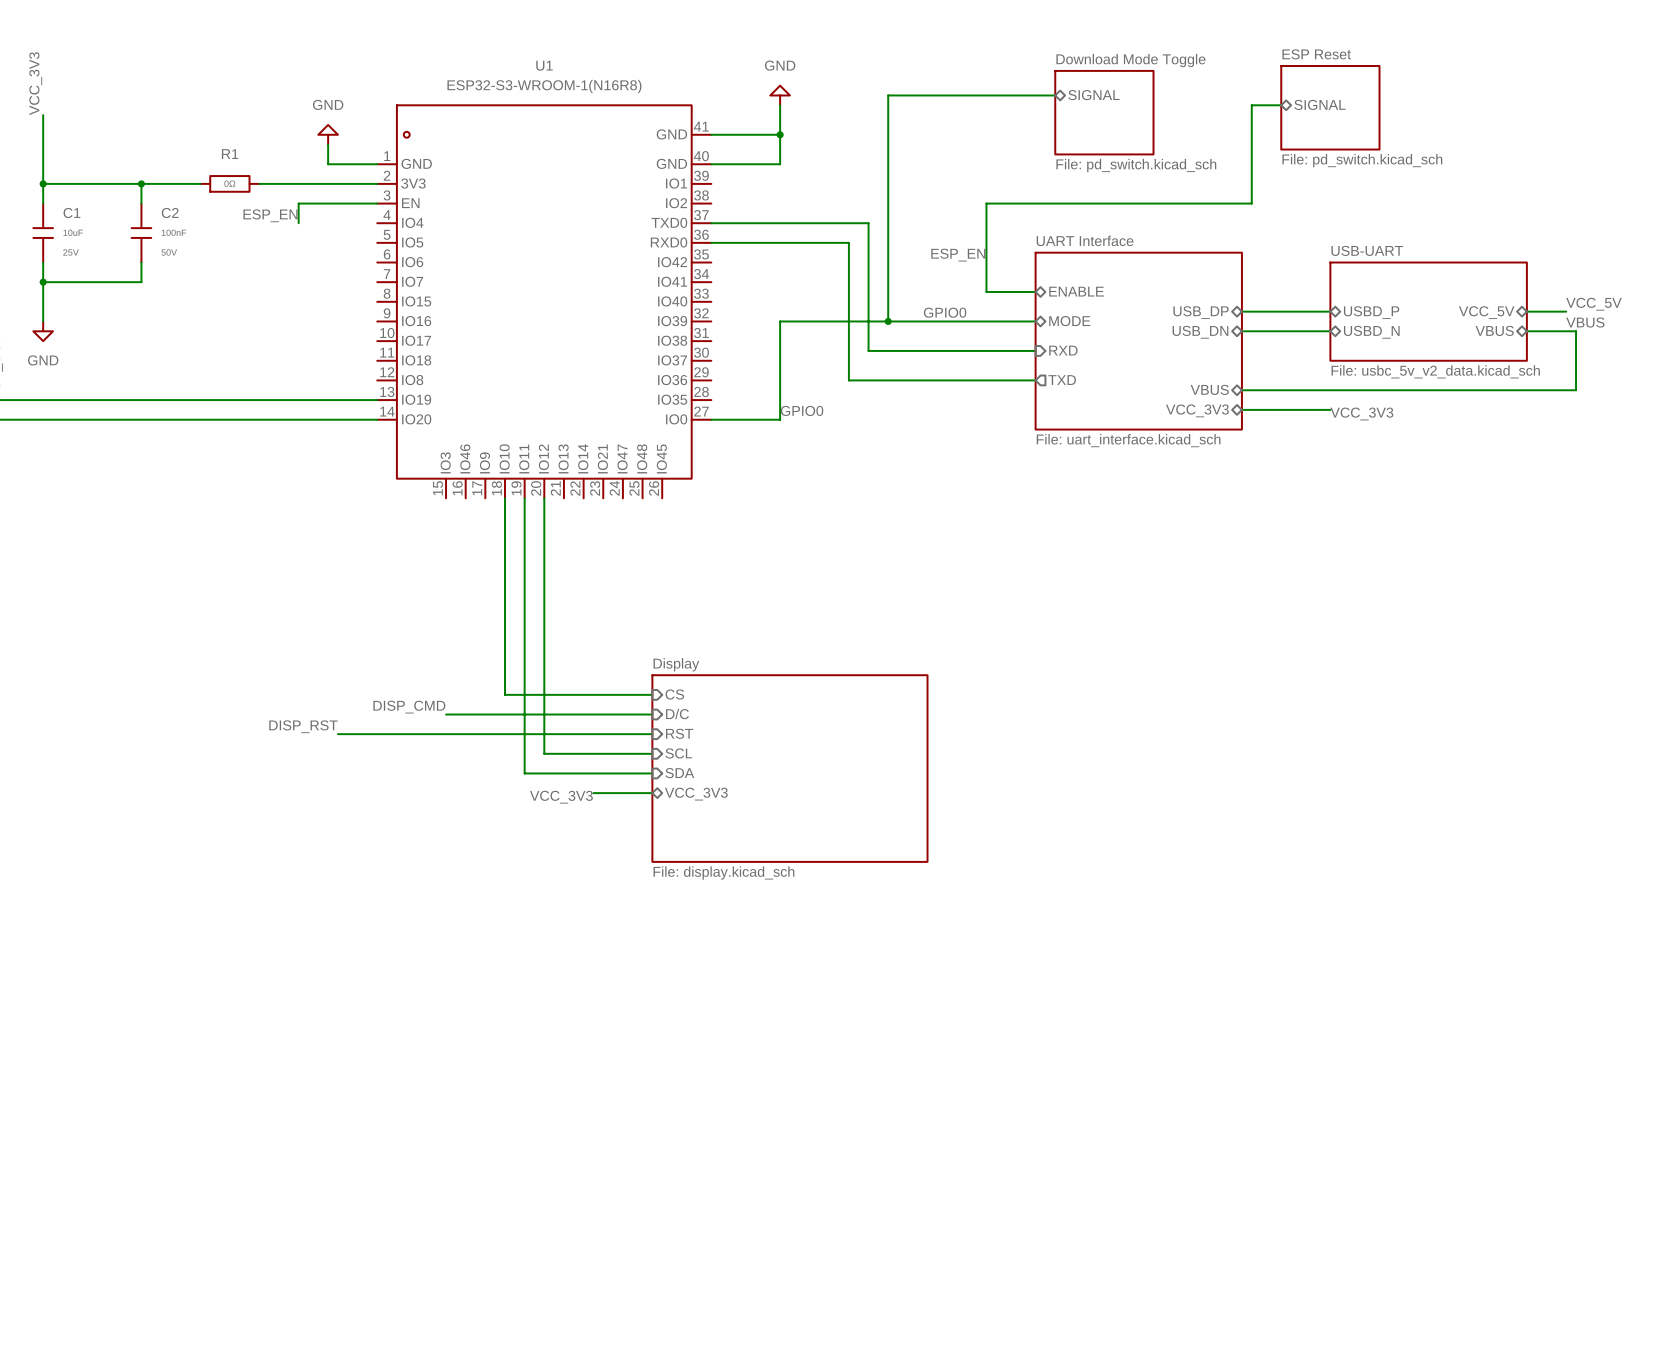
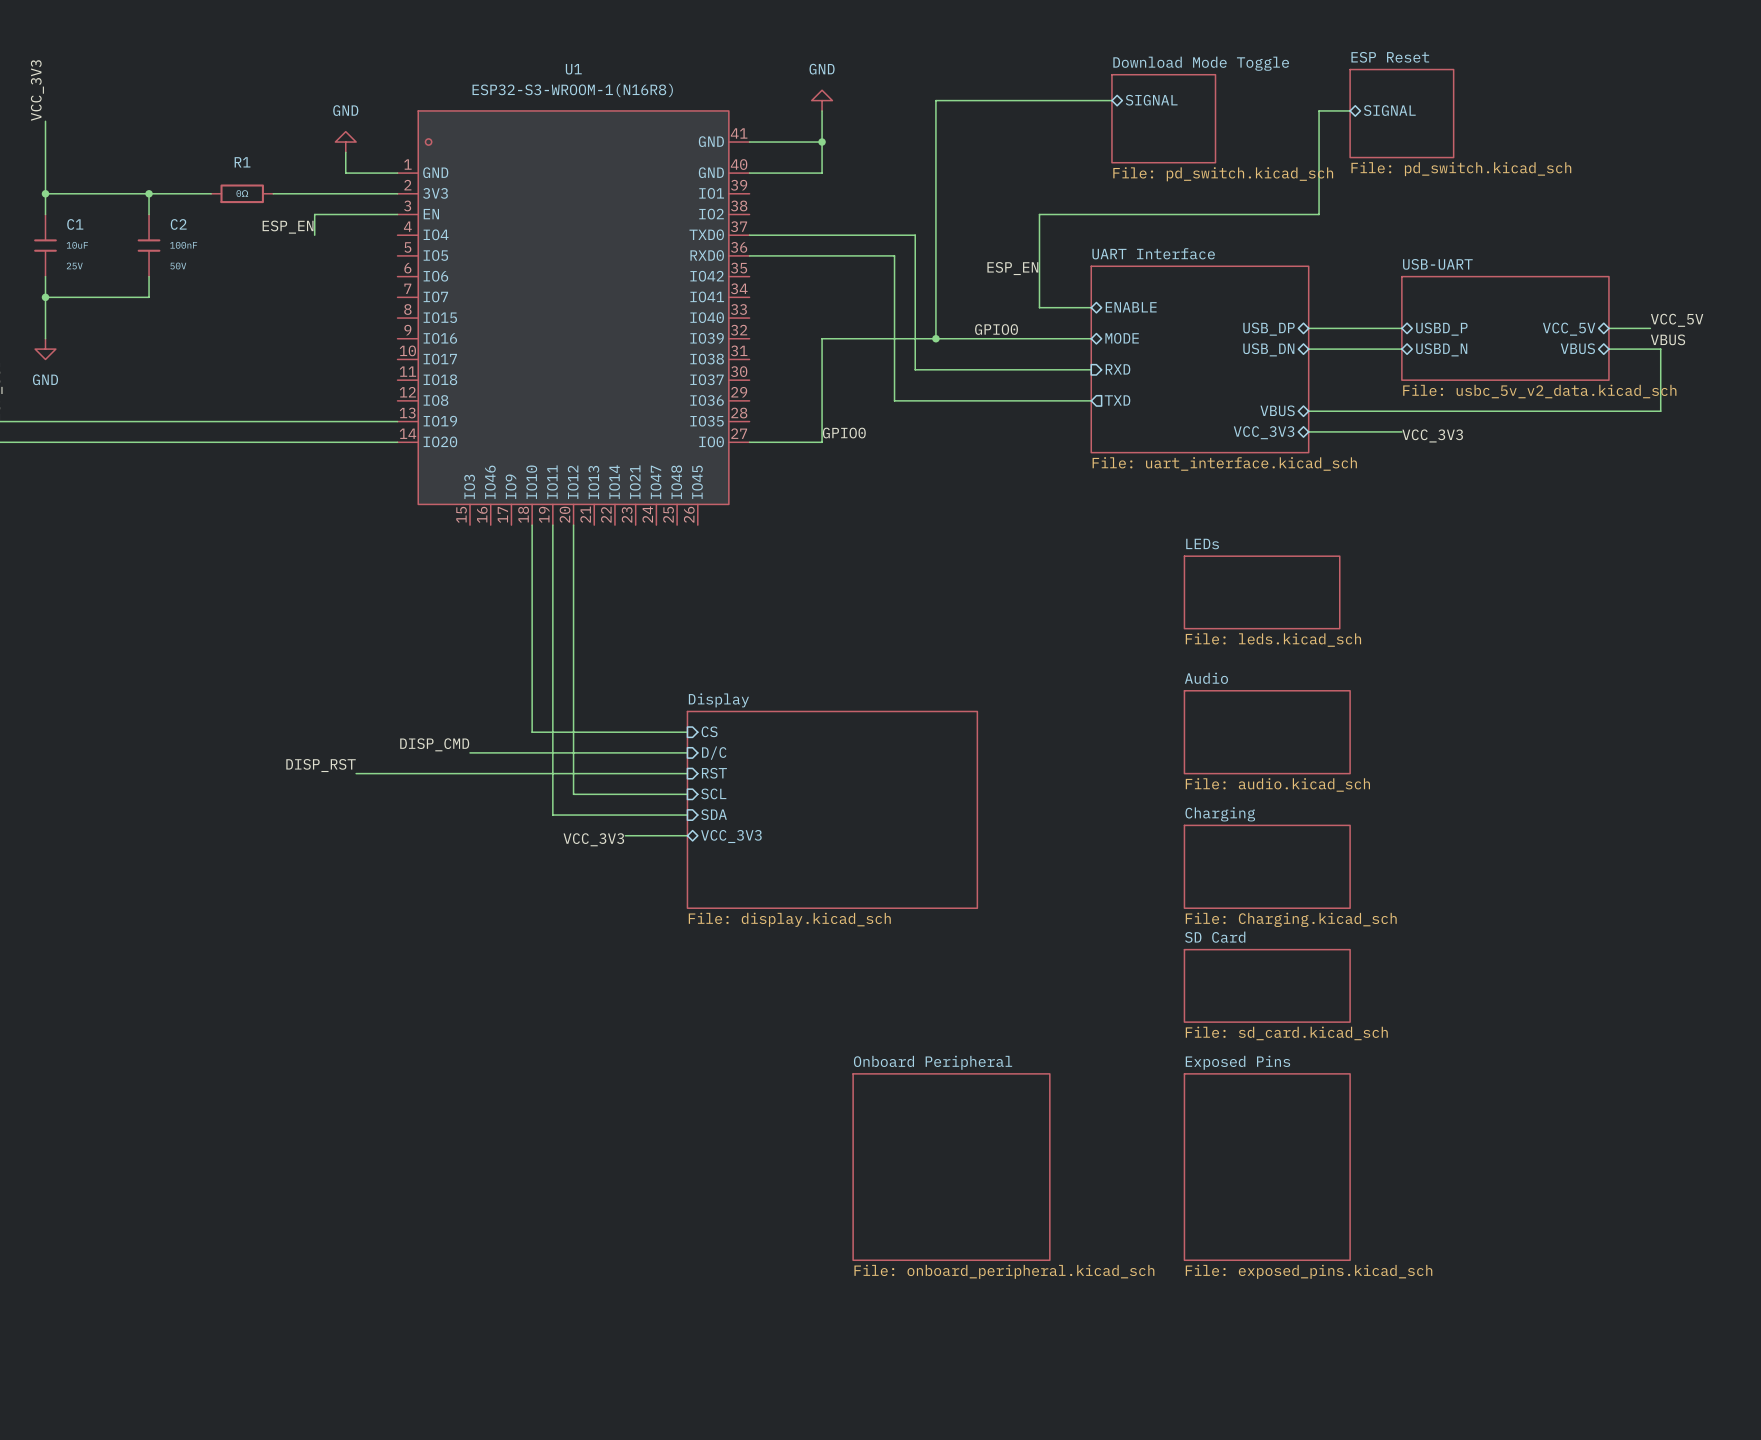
sheet LEDs: none -> File: leds.kicad_sch (1262, 592)
sheet Audio: none -> File: audio.kicad_sch (1267, 732)
sheet Charging: none -> File: Charging.kicad_sch (1267, 866)
sheet SD Card: none -> File: sd_card.kicad_sch (1267, 985)
sheet Onboard Peripheral: none -> File: onboard_peripheral.kicad_sch (951, 1167)
sheet Exposed Pins: none -> File: exposed_pins.kicad_sch (1267, 1167)

